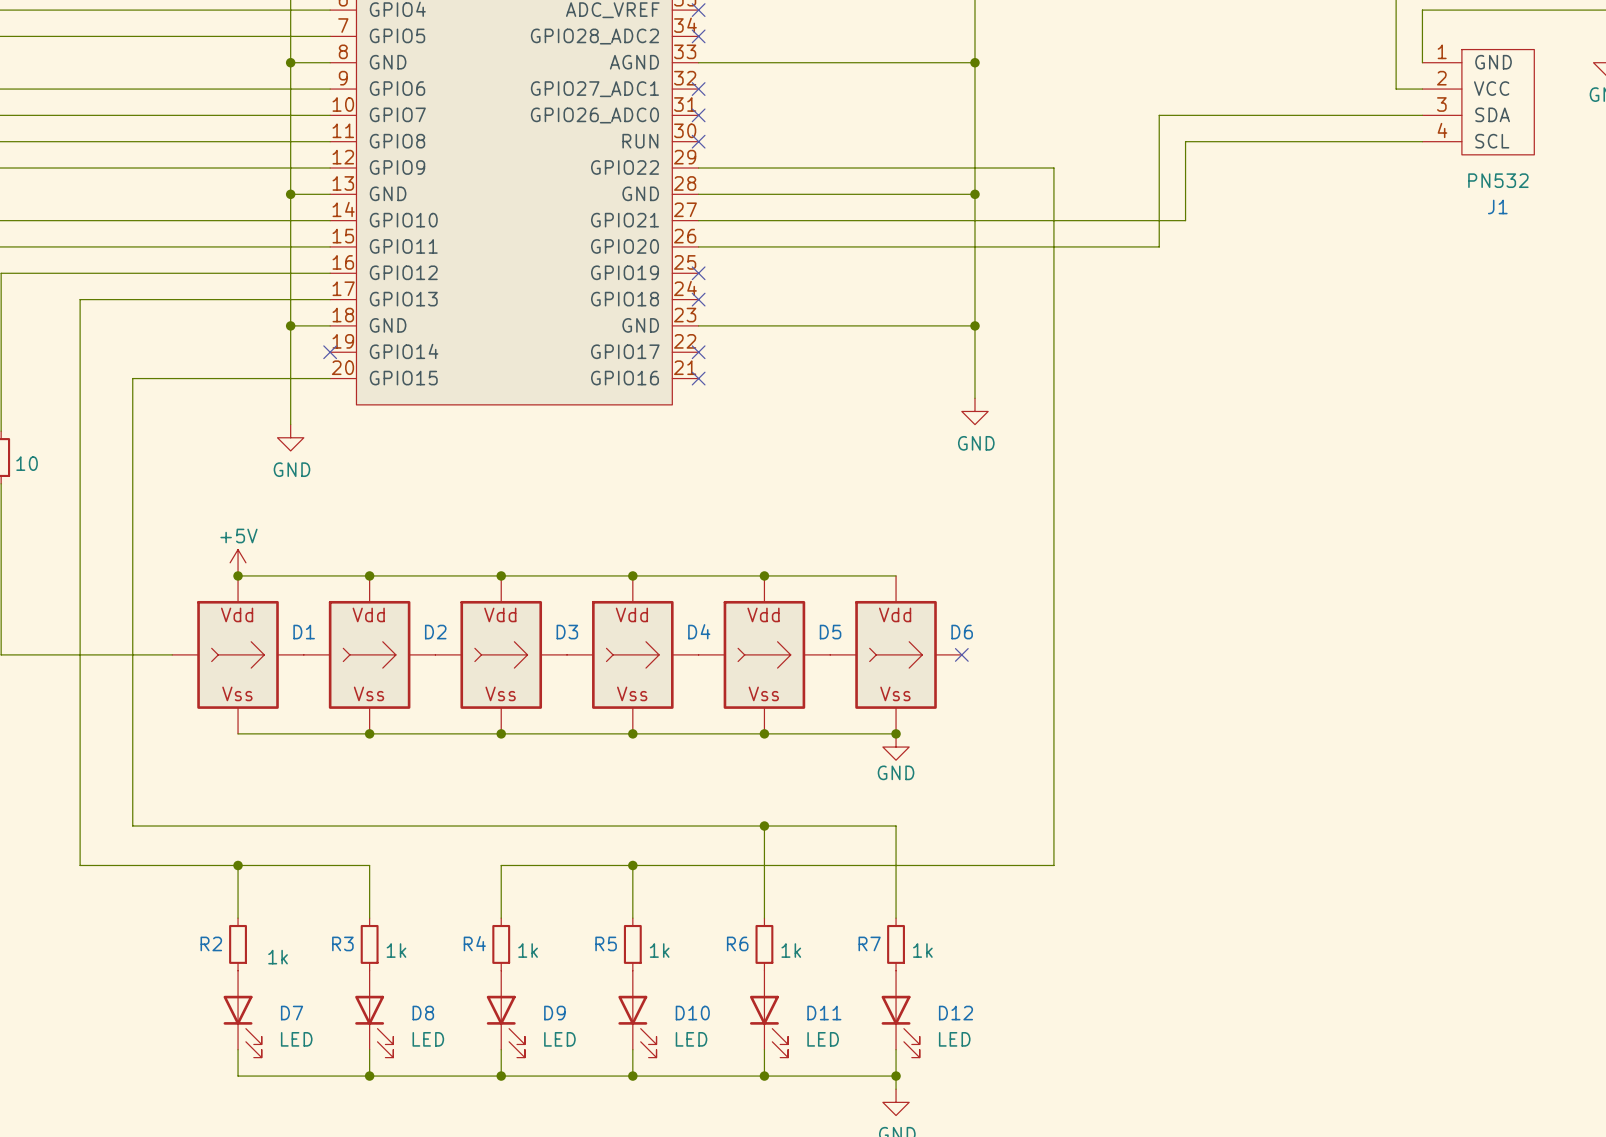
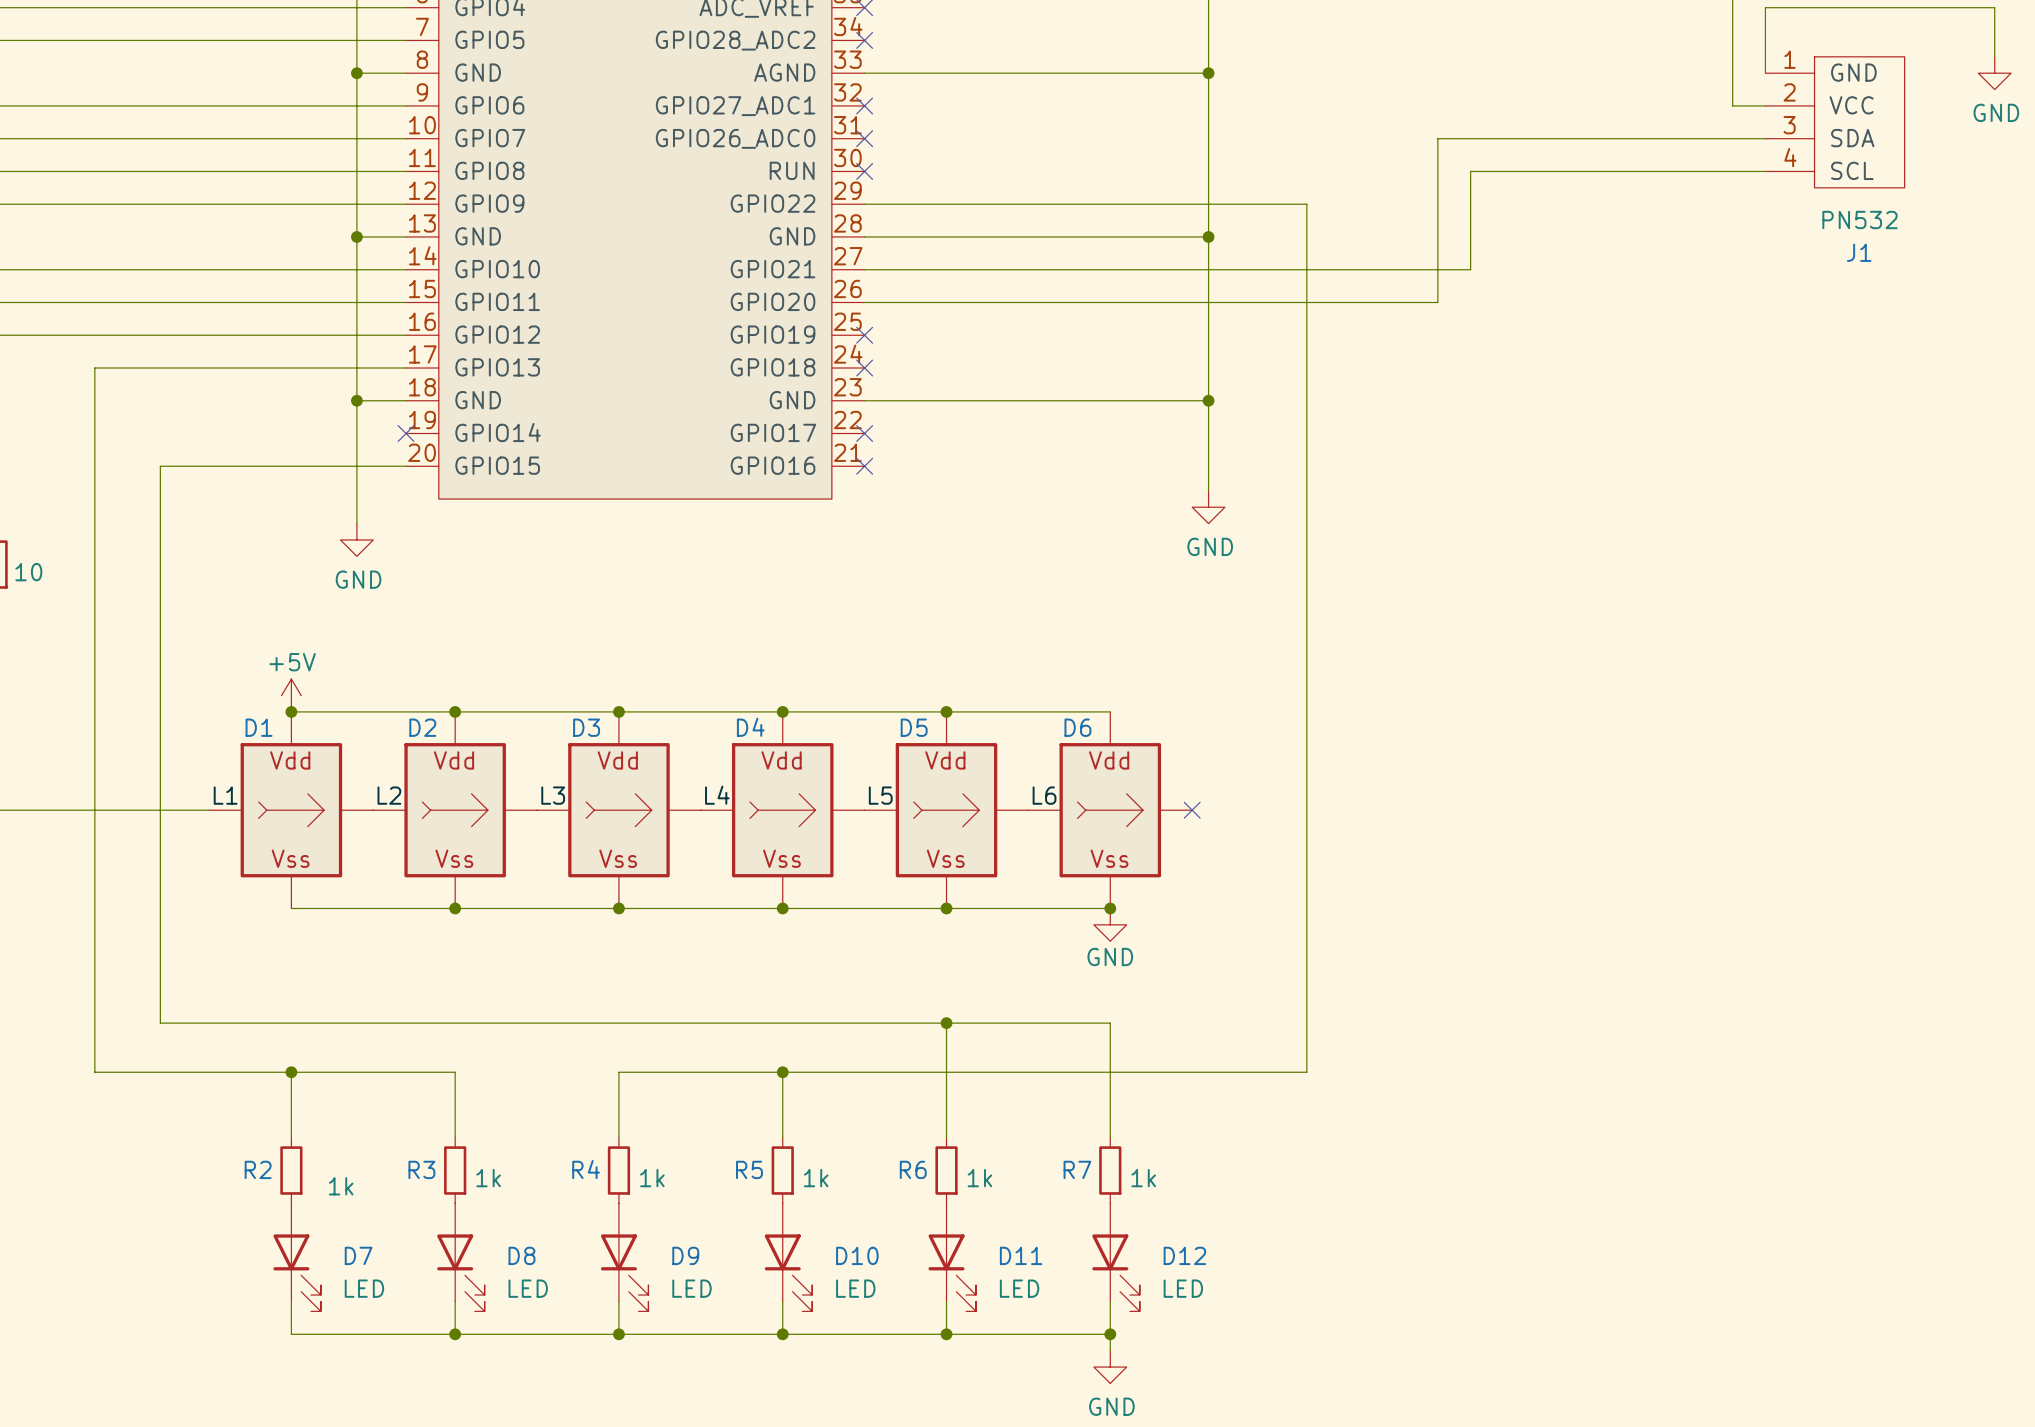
D4 name position: D4 (699, 631) -> D4 (750, 727)
D1 name position: D1 (304, 632) -> D1 (259, 727)
D2 name position: D2 (435, 632) -> D2 (422, 727)
D3 name position: D3 (567, 632) -> D3 (586, 727)
D5 name position: D5 (830, 632) -> D5 (914, 727)
D6 name position: D6 (962, 632) -> D6 (1077, 727)
label: none -> L4 (717, 795)
label: none -> L1 (225, 795)
label: none -> L2 (389, 795)
label: none -> L3 (553, 795)
label: none -> L5 (880, 795)
label: none -> L6 (1044, 795)

